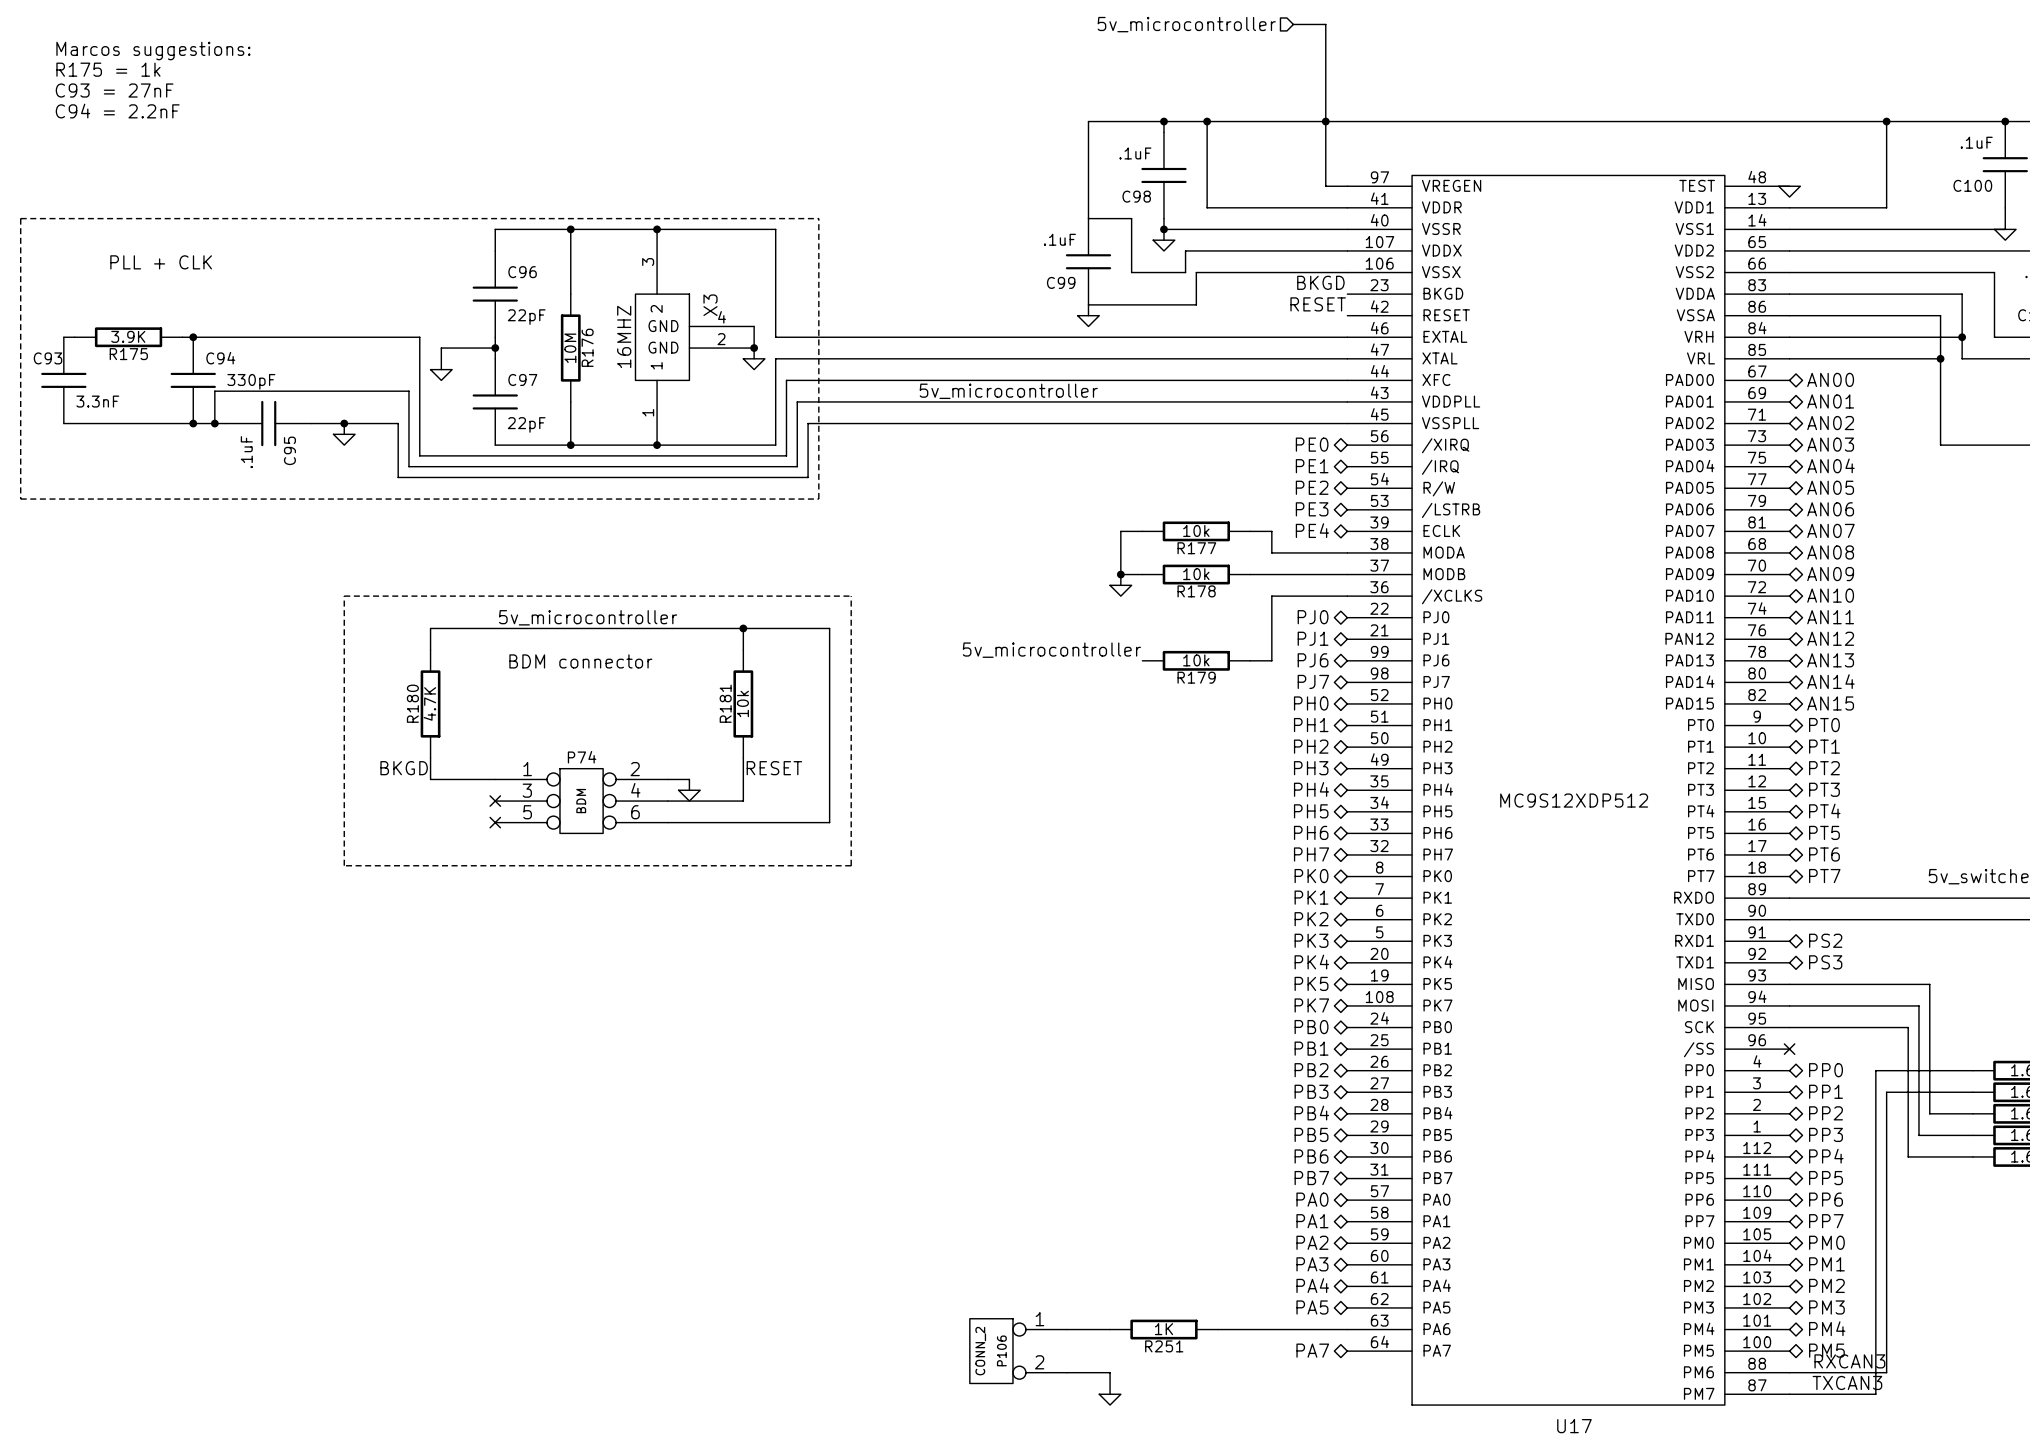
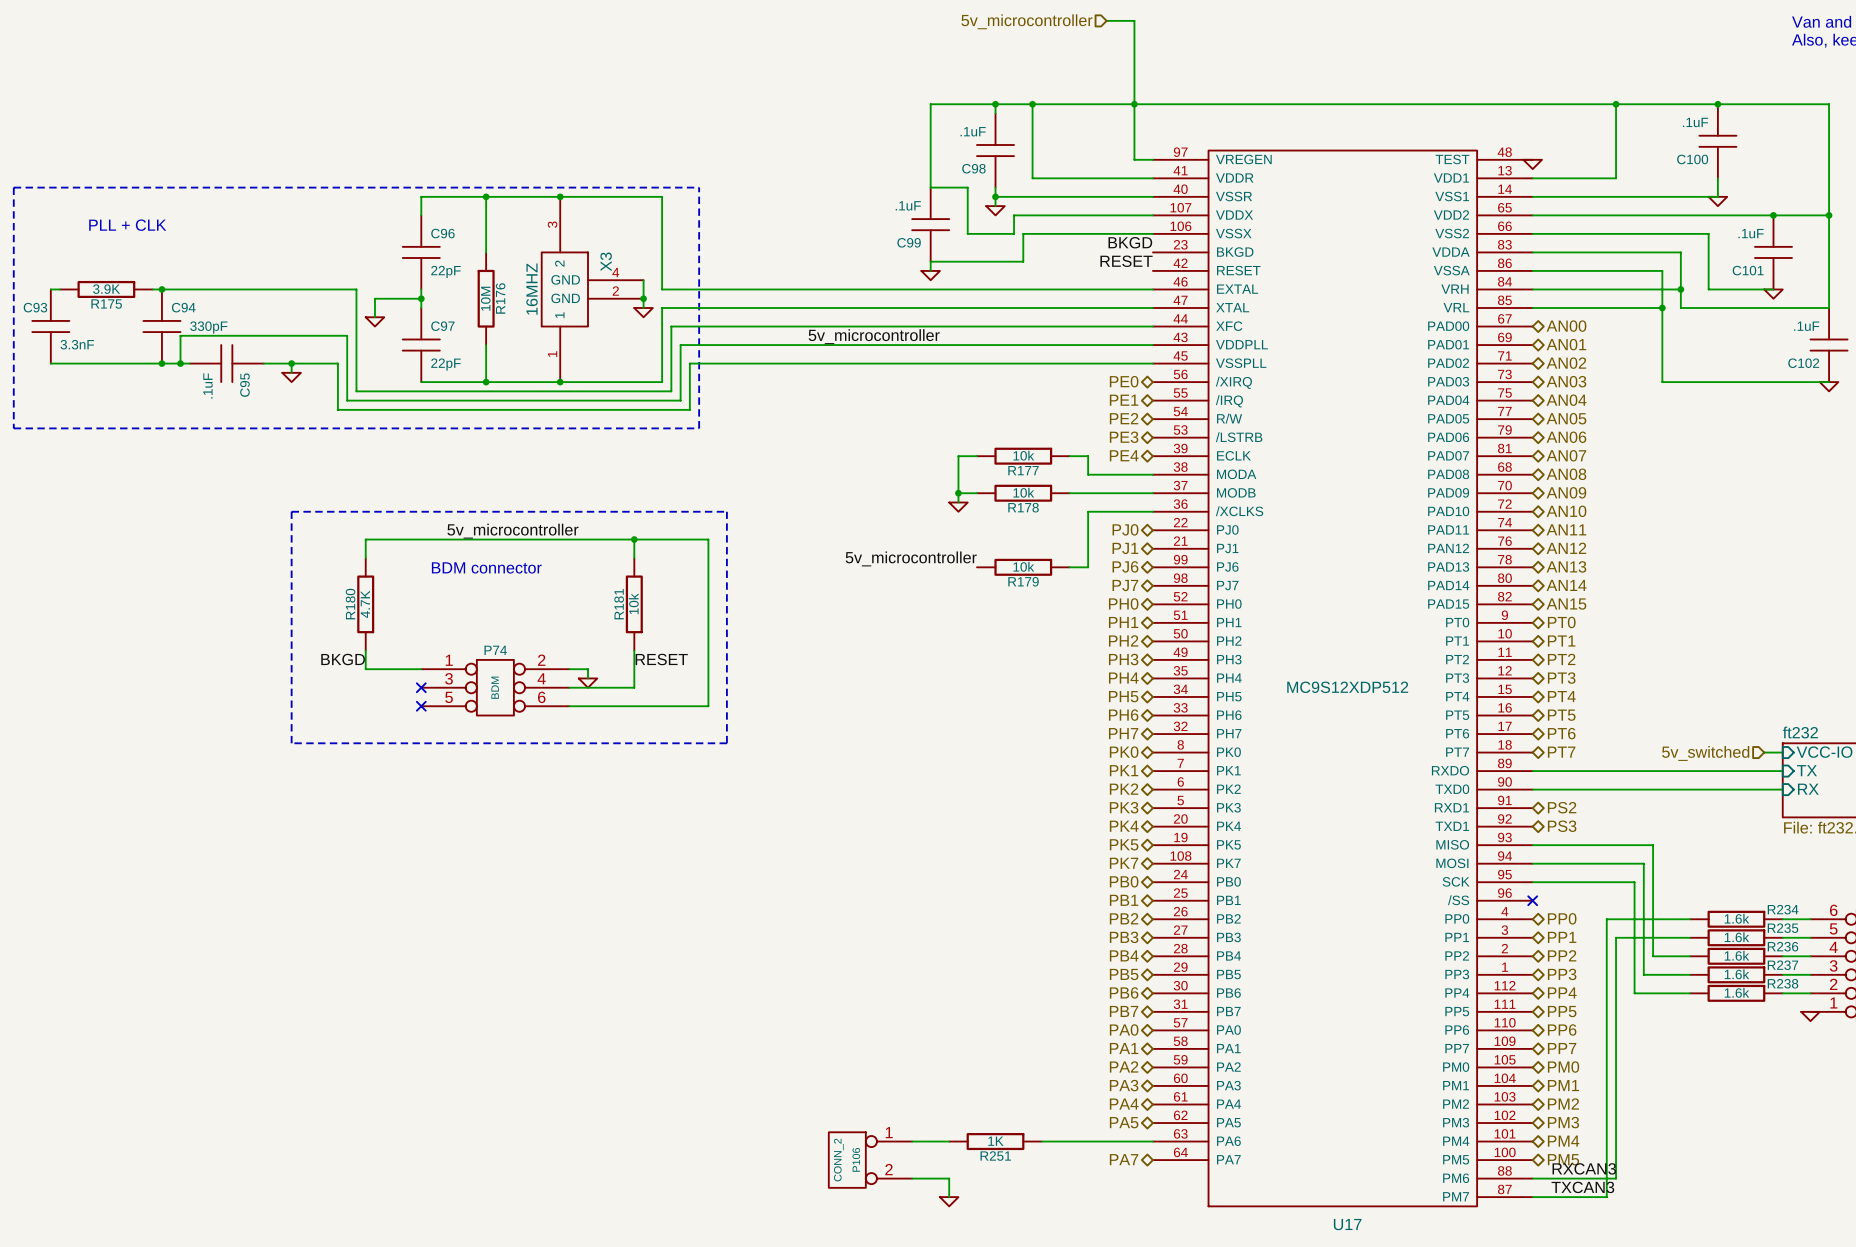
text: Marcos suggestions: (153, 51) -> none
text: R175 = 1k (108, 69) -> none
text: C93 = 27nF (114, 90) -> none
text: C94 = 2.2nF (117, 111) -> none

